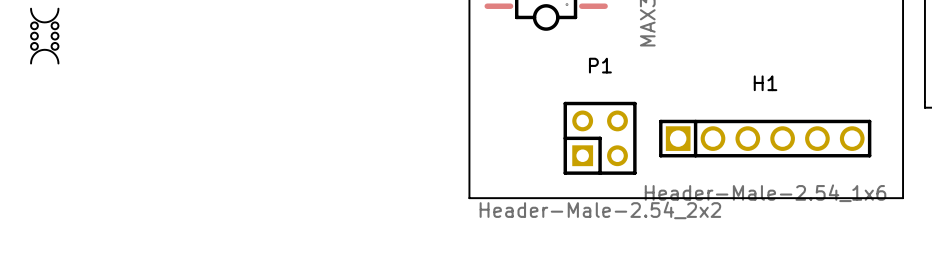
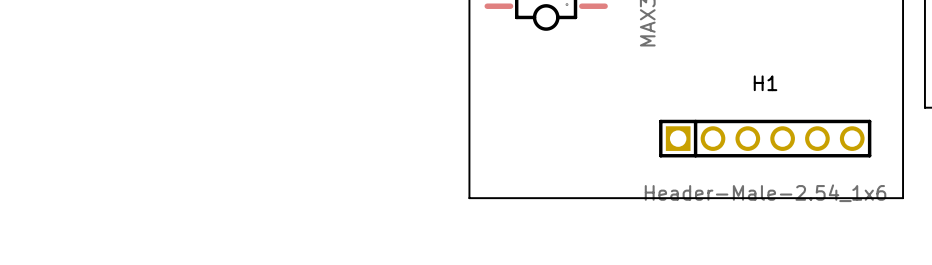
part: (44, 36) -> none
P1: Header-Male-2.54_2x2 (600, 138) -> none

